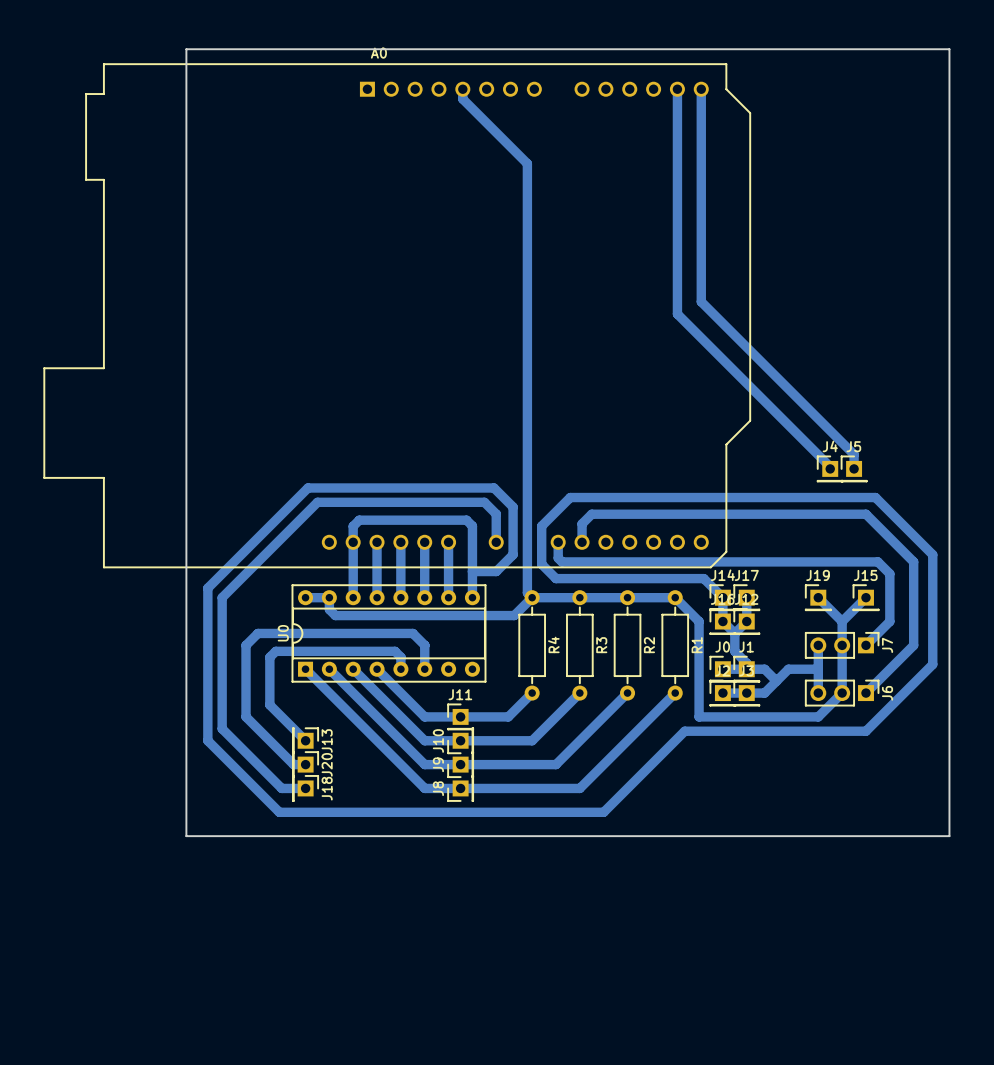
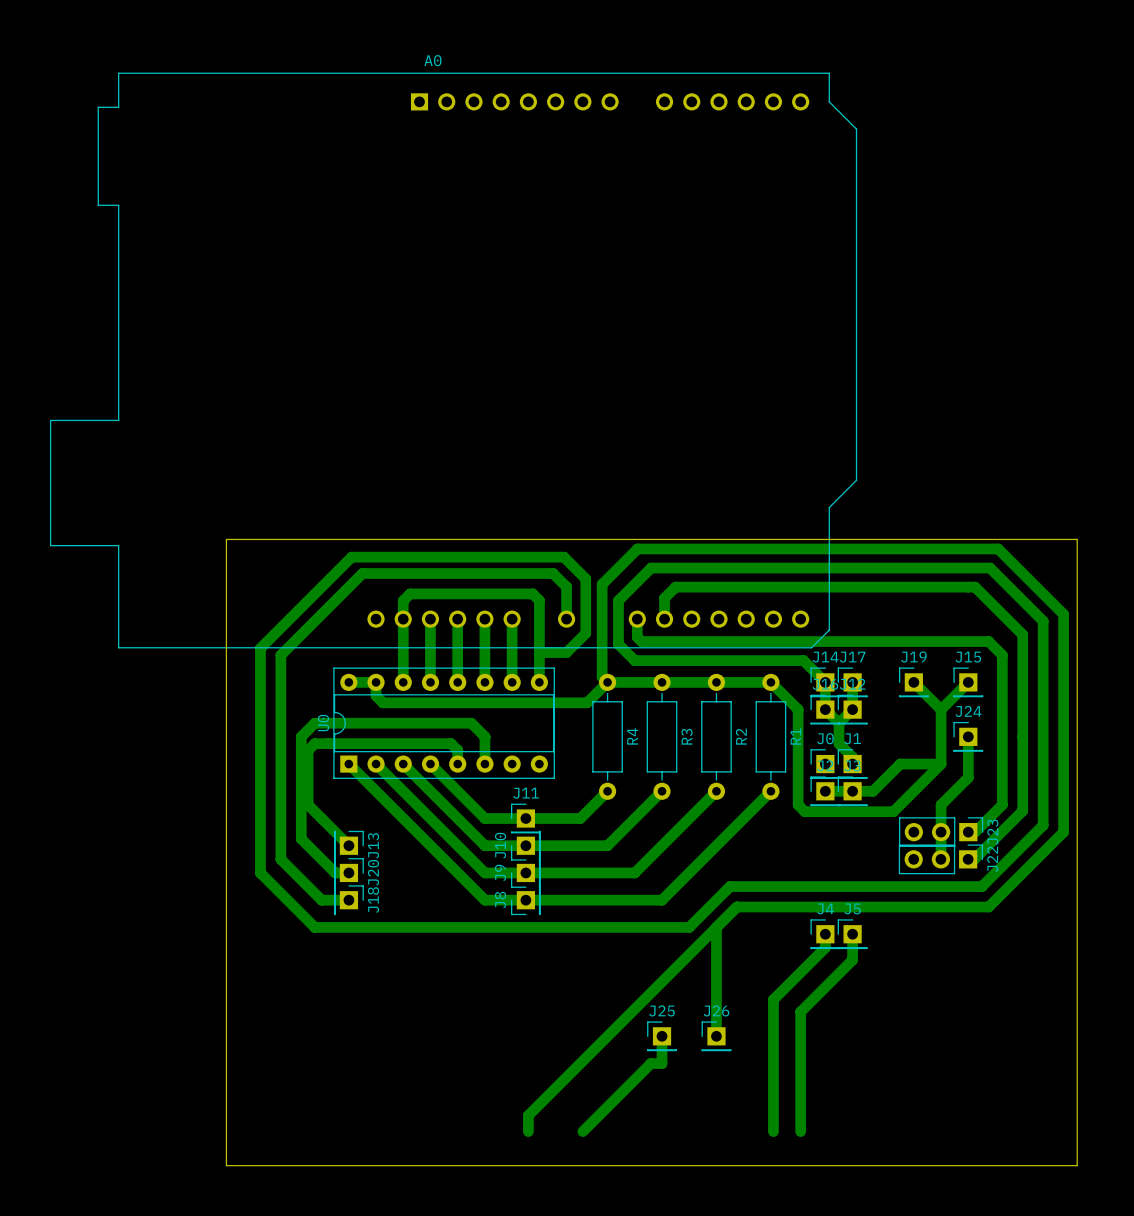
board edge: (186, 49) (949, 49) (949, 836) (186, 836) (186, 49) -> none
bottom track: (462, 89) (462, 99) (527, 163) (527, 511) -> (528, 1131) (528, 1115) (736, 906) (988, 906) (1063, 832) (1063, 614) (998, 548) (637, 548) (602, 584)
bottom track: (677, 89) (677, 314) (830, 468) -> none
bottom track: (701, 89) (701, 301) (854, 454) (854, 468) -> none
J4 position: (830, 468) -> (825, 934)
J5 position: (854, 468) -> (852, 934)
board edge: none -> (226, 539) (1077, 539) (1077, 1165) (226, 1165) (226, 539)
bottom track: (867, 497) (875, 497) (932, 554) (932, 664) (866, 731) (684, 731) (639, 776) -> (1043, 736) (1043, 825) (981, 886) (730, 886)
bottom track: (854, 514) (866, 514) (913, 561) -> (990, 568) (1043, 621) (1043, 641)
bottom track: none -> (975, 587) (1022, 634) (1022, 810) (974, 859) (968, 859)
bottom track: (866, 561) (877, 561) (889, 573) (889, 621) (866, 645) -> (988, 641) (1002, 655) (1002, 804) (975, 832) (968, 832)
bottom track: (228, 567) (207, 588) (207, 740) (279, 812) -> (260, 648) (260, 872) (314, 927) (318, 927)
bottom track: (246, 573) (222, 597) (222, 728) (246, 752) -> none
bottom track: (818, 597) (842, 621) -> (913, 682) (941, 709)
J19 position: (818, 597) -> (913, 682)
bottom track: (866, 597) (842, 621) -> (968, 682) (941, 709)
J15 position: (866, 597) -> (968, 682)
bottom track: (842, 621) (842, 693) (818, 716) (699, 716) (699, 704) -> (941, 709) (941, 764) (893, 811) (804, 811) (798, 804)
bottom track: (275, 633) (257, 633) (246, 645) -> (280, 655) (280, 736)
bottom track: none -> (314, 723) (301, 736) (301, 838)
bottom track: (818, 645) (818, 693) -> none
J7: (842, 645) -> none
bottom track: none -> (968, 736) (968, 777) (941, 804) (940, 859)
J24: none -> (968, 736)
bottom track: (913, 645) (866, 693) -> none
bottom track: (722, 669) (764, 669) (776, 681) -> none
J6: (842, 693) -> none
bottom track: (246, 716) (263, 734) -> (280, 818) (280, 859)
J23: none -> (941, 832)
J22: none -> (940, 859)
bottom track: none -> (716, 927) (716, 1036)
bottom track: none -> (825, 934) (825, 947) (773, 999) (773, 1131)
bottom track: none -> (852, 934) (852, 960) (800, 1011) (800, 1131)
bottom track: none -> (662, 1036) (662, 1063) (650, 1063) (582, 1131)
J25: none -> (662, 1036)
J26: none -> (716, 1036)

